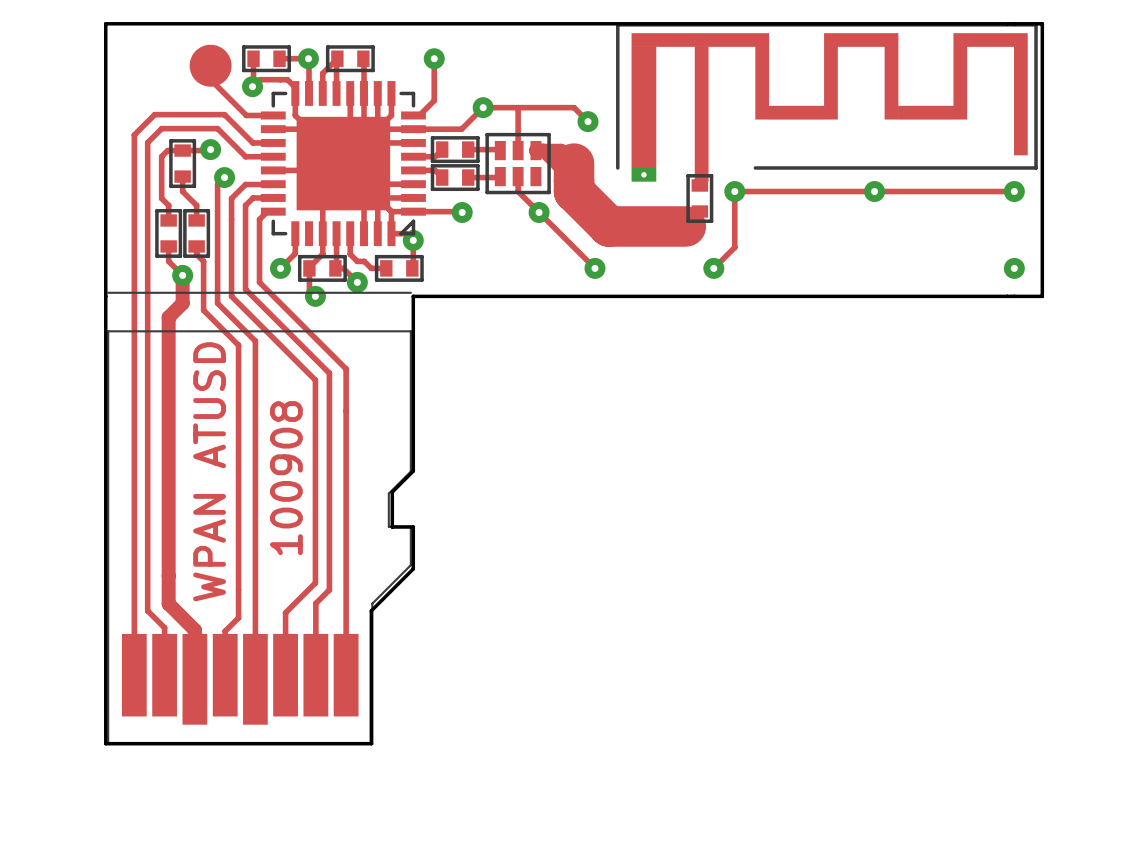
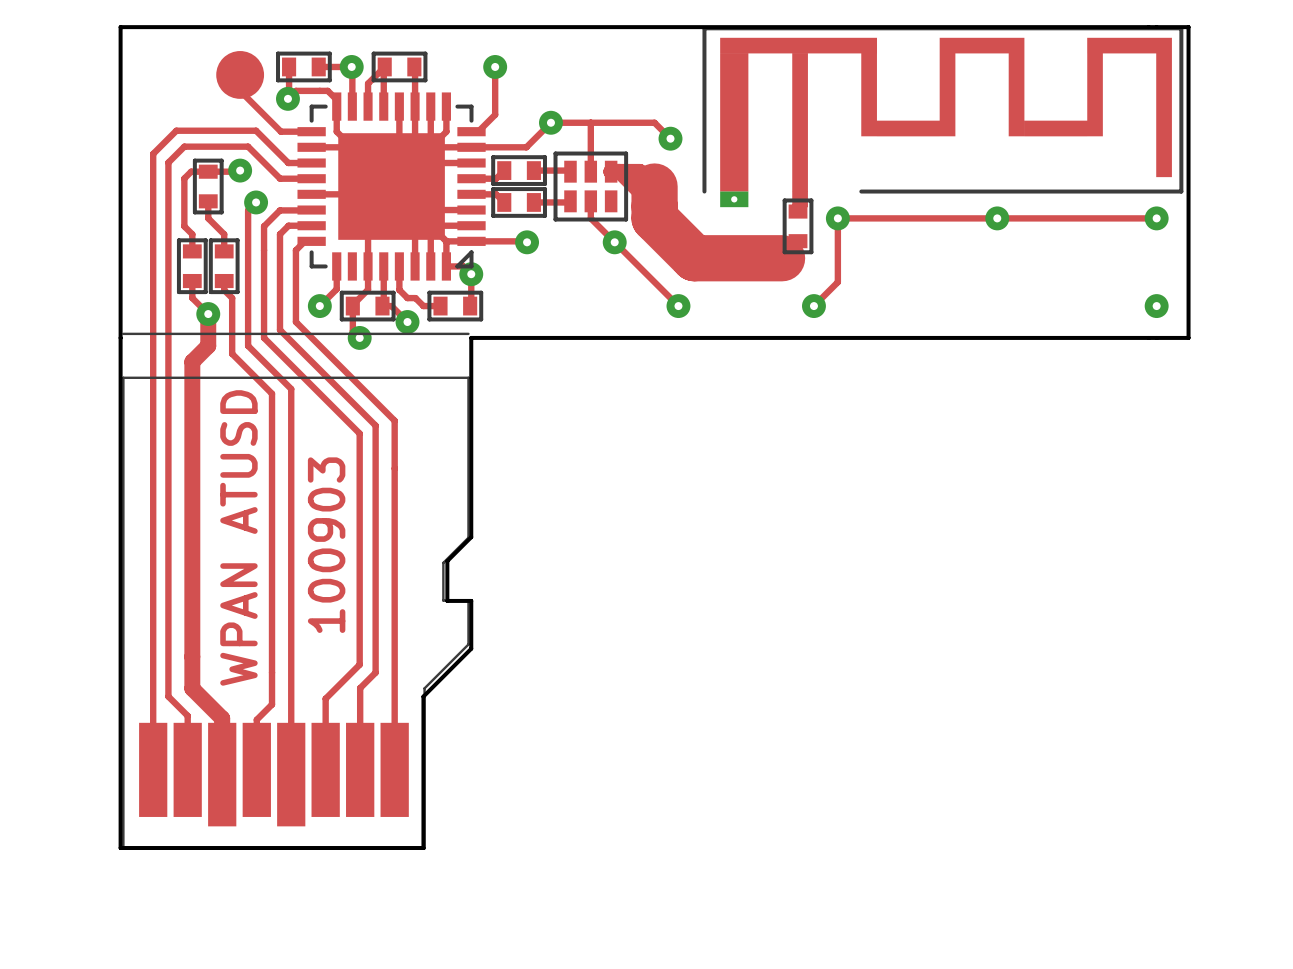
text: 100908 (286, 478) -> 100903 (326, 545)

